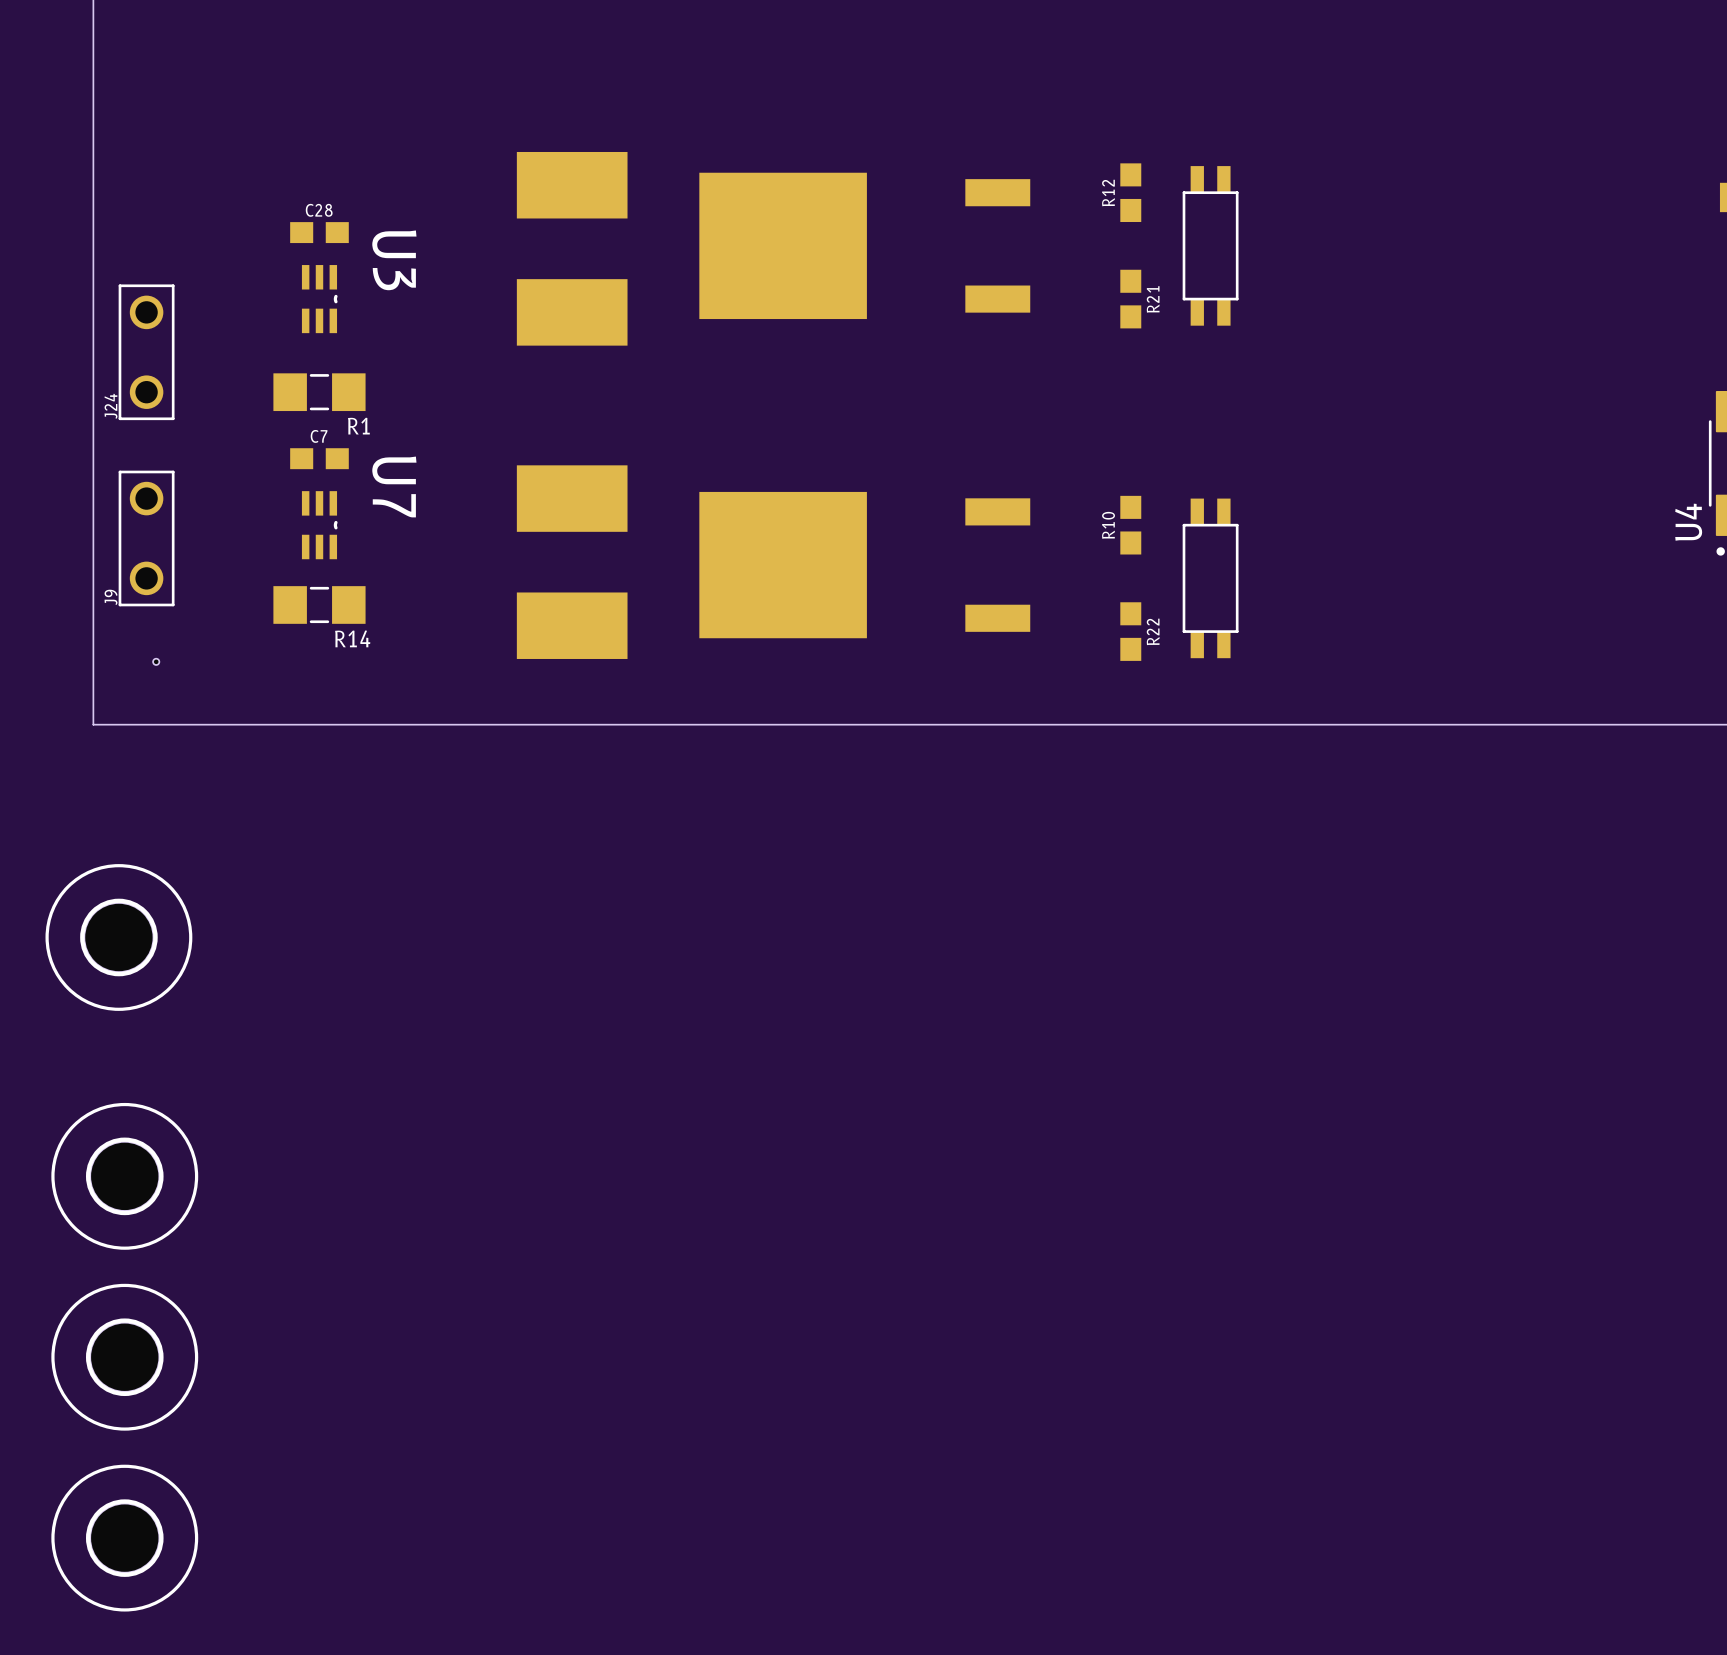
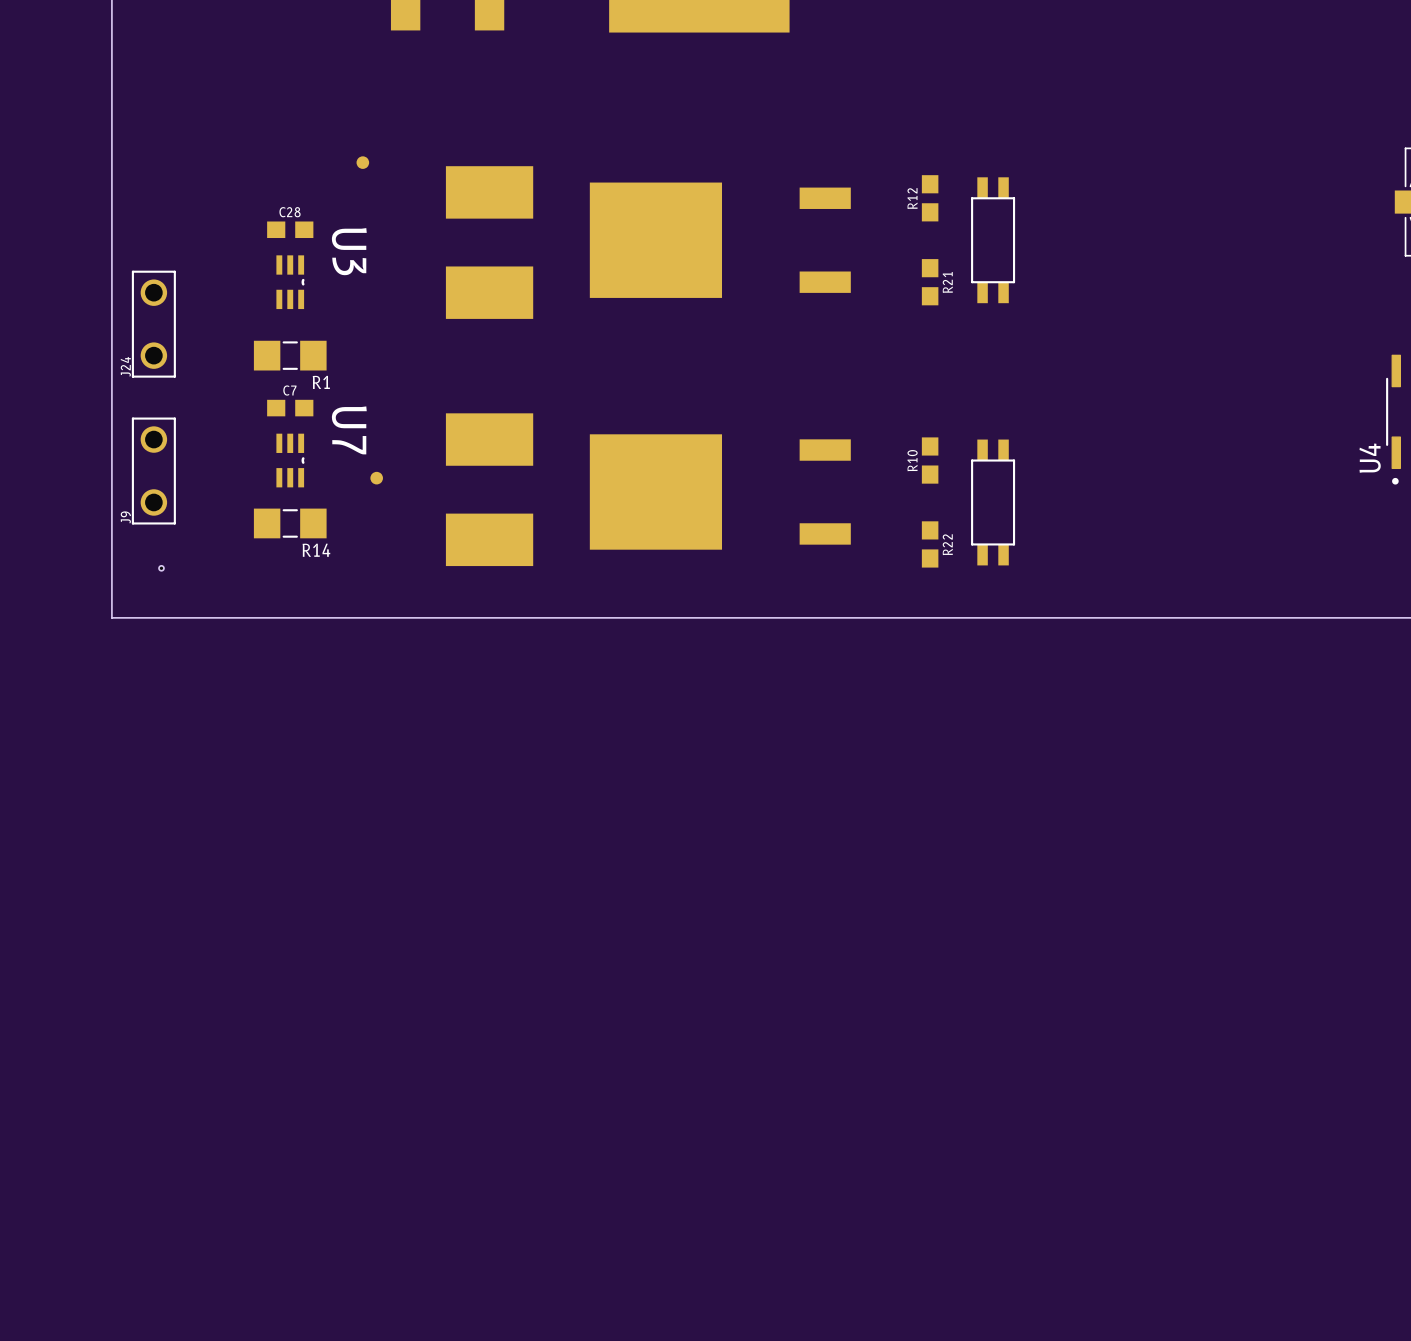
part: none -> (362, 162)
part: none -> (376, 478)
part: (118, 937) -> none
part: (124, 1176) -> none
part: (124, 1357) -> none
part: (124, 1538) -> none

